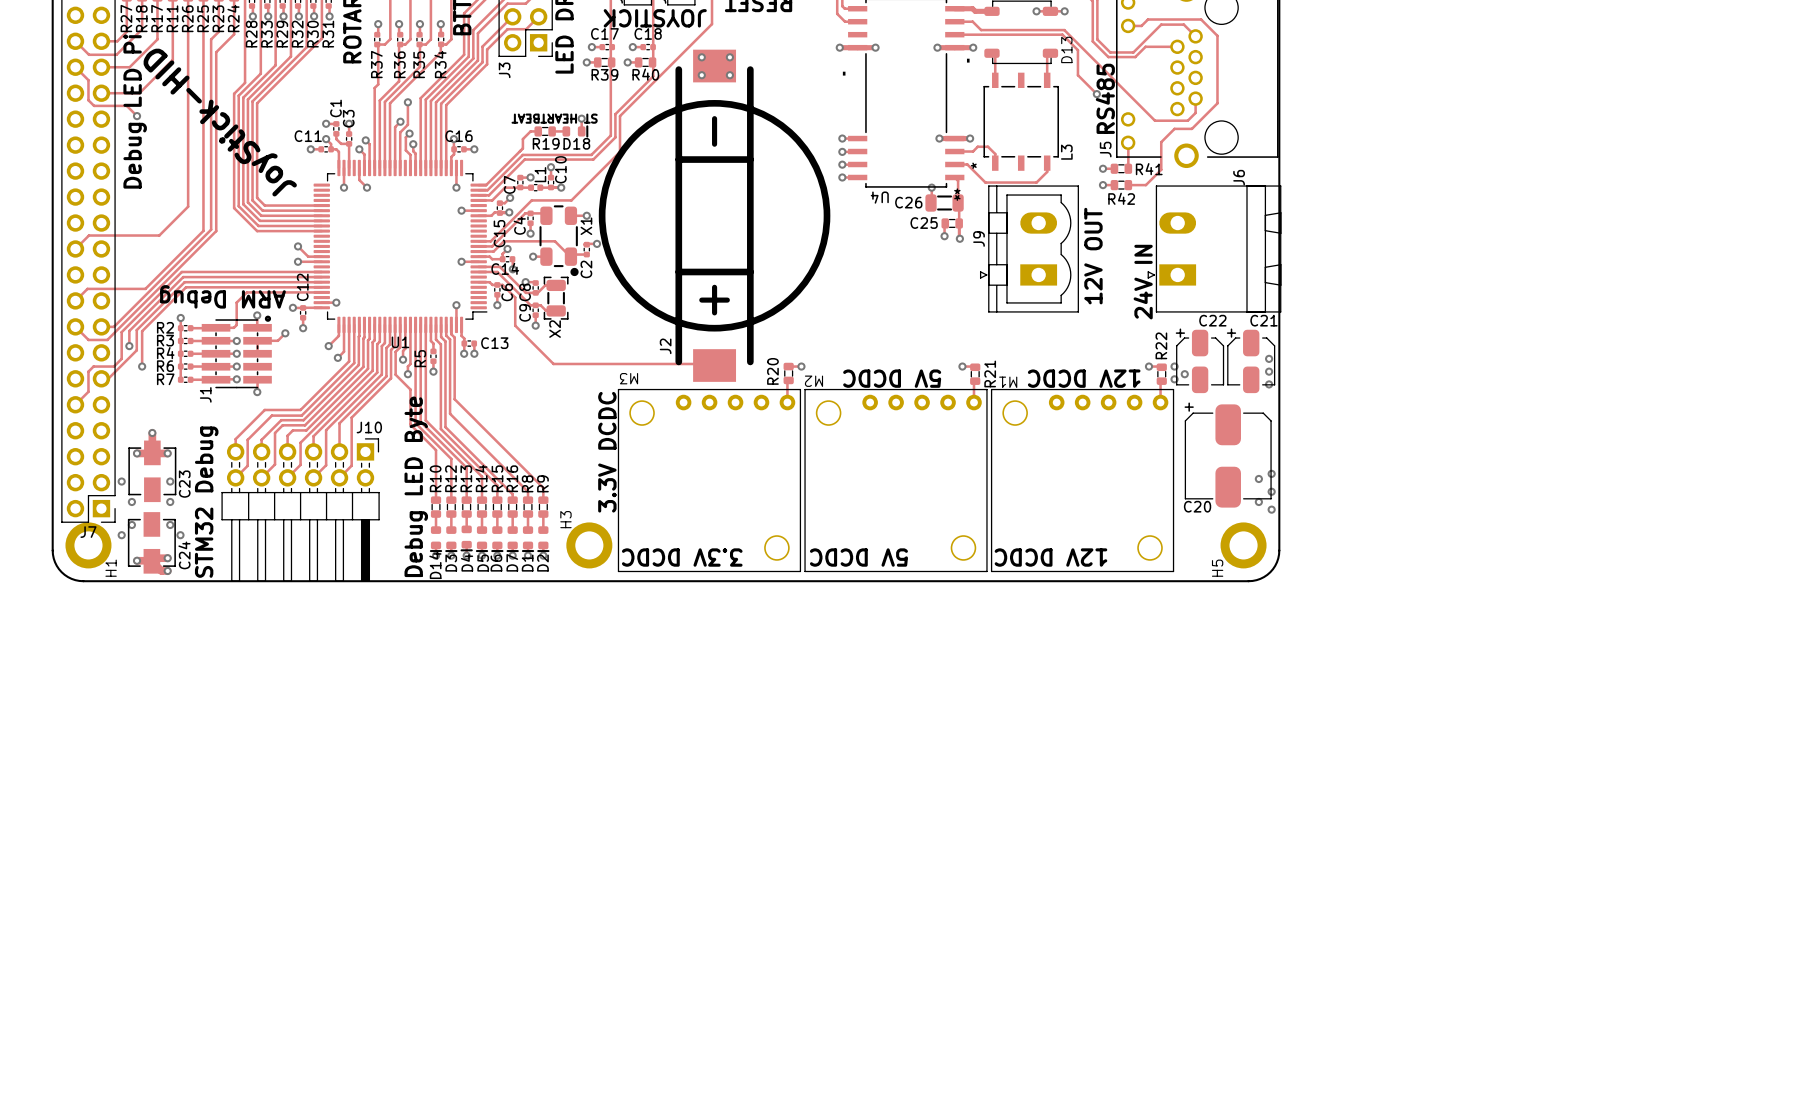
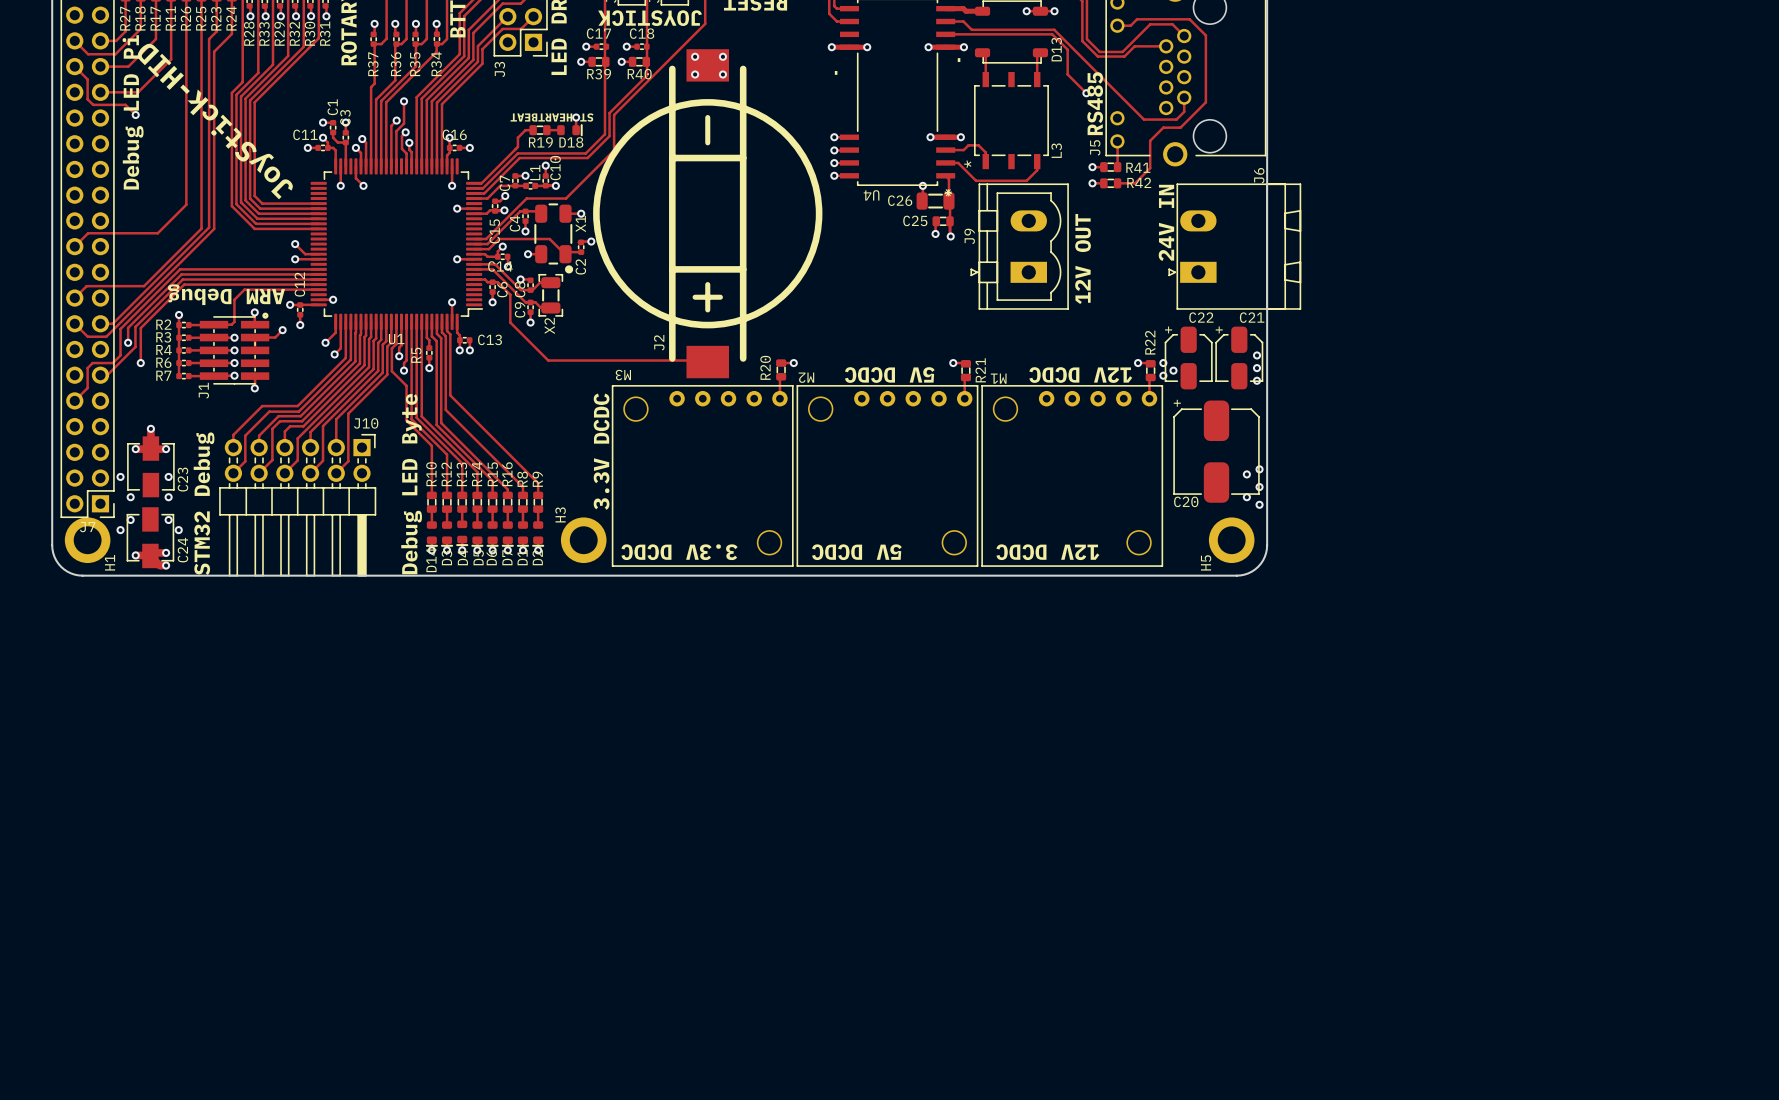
J6 footprint: [1147, 185, 1282, 313] -> [1168, 183, 1302, 310]
R42 name position: R42 (1121, 198) -> R42 (1139, 182)
text position: 24V IN (1143, 282) -> 24V IN (1166, 222)

